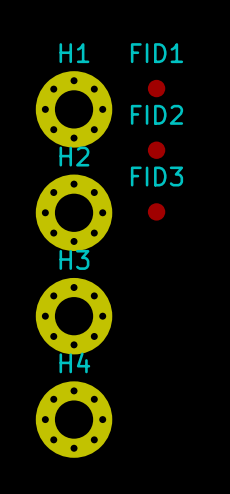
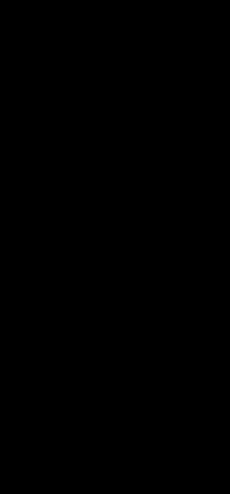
FID1: (156, 88) -> none
H1: (74, 109) -> none
FID2: (156, 150) -> none
FID3: (156, 211) -> none
H2: (74, 212) -> none
H3: (74, 316) -> none
H4: (74, 419) -> none

